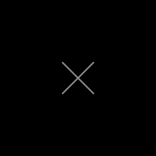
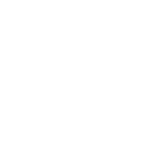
no-connect mark: (78, 78) -> none

